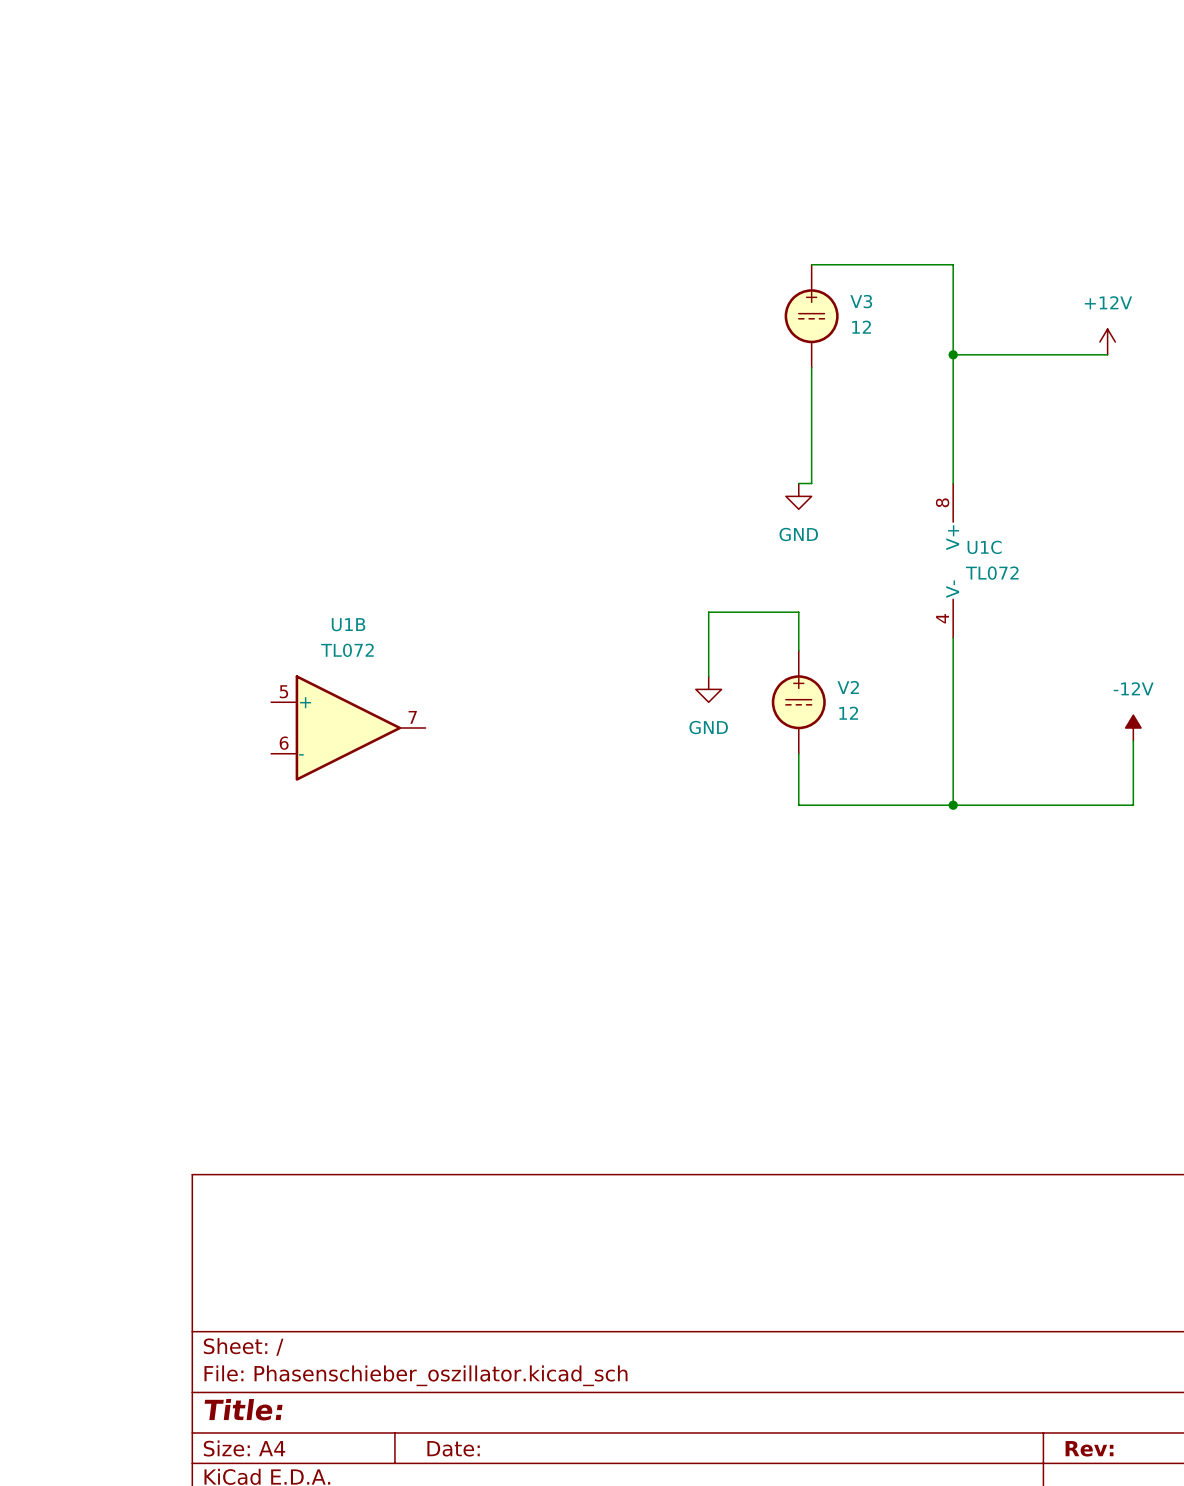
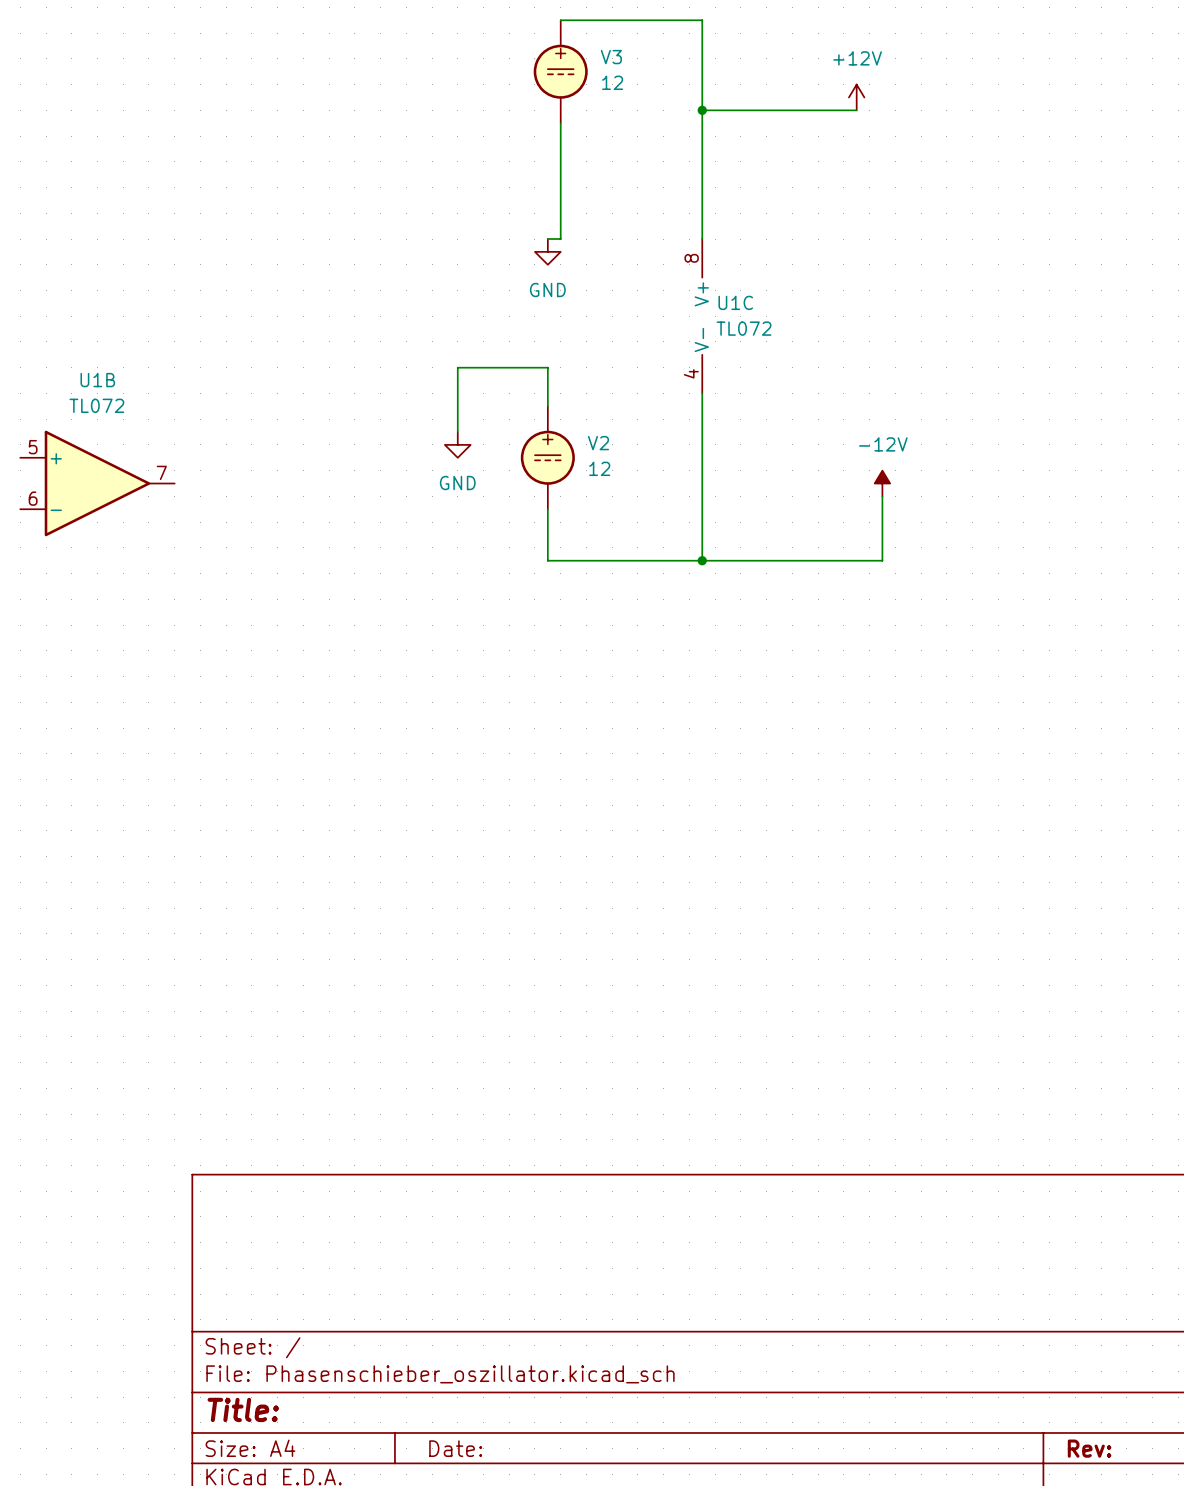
wire: none -> (560, 20) (702, 20) (702, 239)
power symbol: none -> +12V (856, 97)
wire: none -> (702, 110) (856, 110)
junction: none -> (702, 110)
wire: none -> (560, 123) (560, 239) (547, 239)
power symbol: none -> GND (547, 251)
wire: (811, 264) (953, 264) (953, 483) -> none
V3 position: (811, 316) -> (560, 71)
power symbol: +12V (1107, 341) -> none
wire: (953, 354) (1107, 354) -> none
junction: (953, 354) -> none
wire: (811, 367) (811, 483) (798, 483) -> none
wire: none -> (702, 393) (702, 560)
wire: none -> (547, 406) (547, 367) (457, 367) (457, 432)
power symbol: none -> GND (457, 444)
power symbol: none -> -12V (882, 483)
power symbol: GND (798, 496) -> none
wire: none -> (882, 496) (882, 560) (547, 560) (547, 509)
junction: none -> (702, 560)
U1C position: (953, 560) -> (702, 316)
wire: (953, 637) (953, 805) -> none
wire: (798, 650) (798, 612) (708, 612) (708, 676) -> none
power symbol: GND (708, 689) -> none
V2 position: (798, 702) -> (547, 457)
U1B position: (348, 728) -> (97, 483)
power symbol: -12V (1133, 728) -> none
wire: (1133, 740) (1133, 805) (798, 805) (798, 753) -> none
junction: (953, 805) -> none

